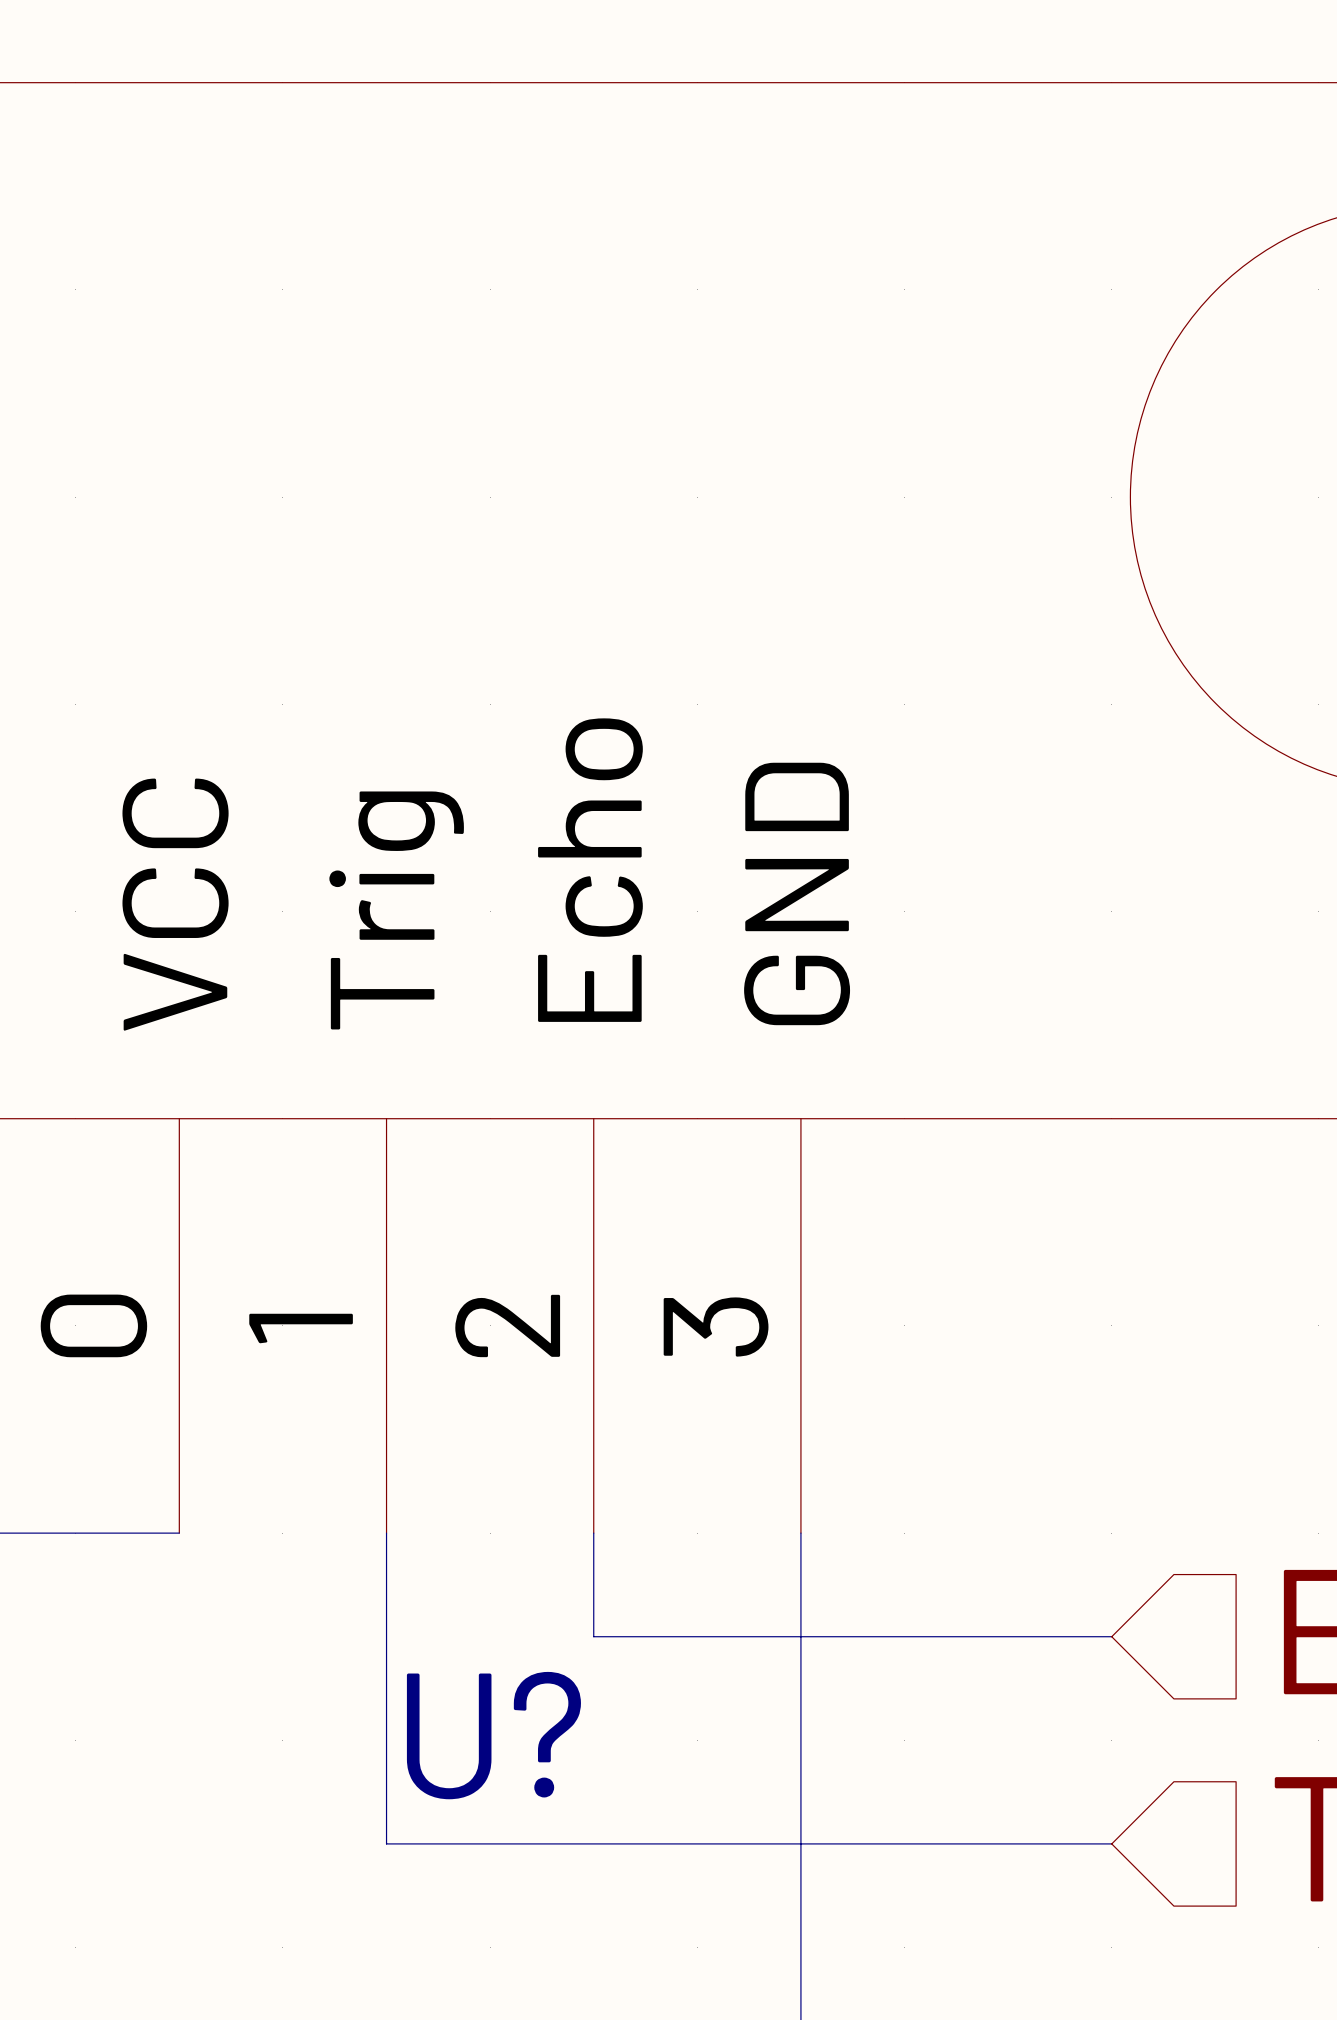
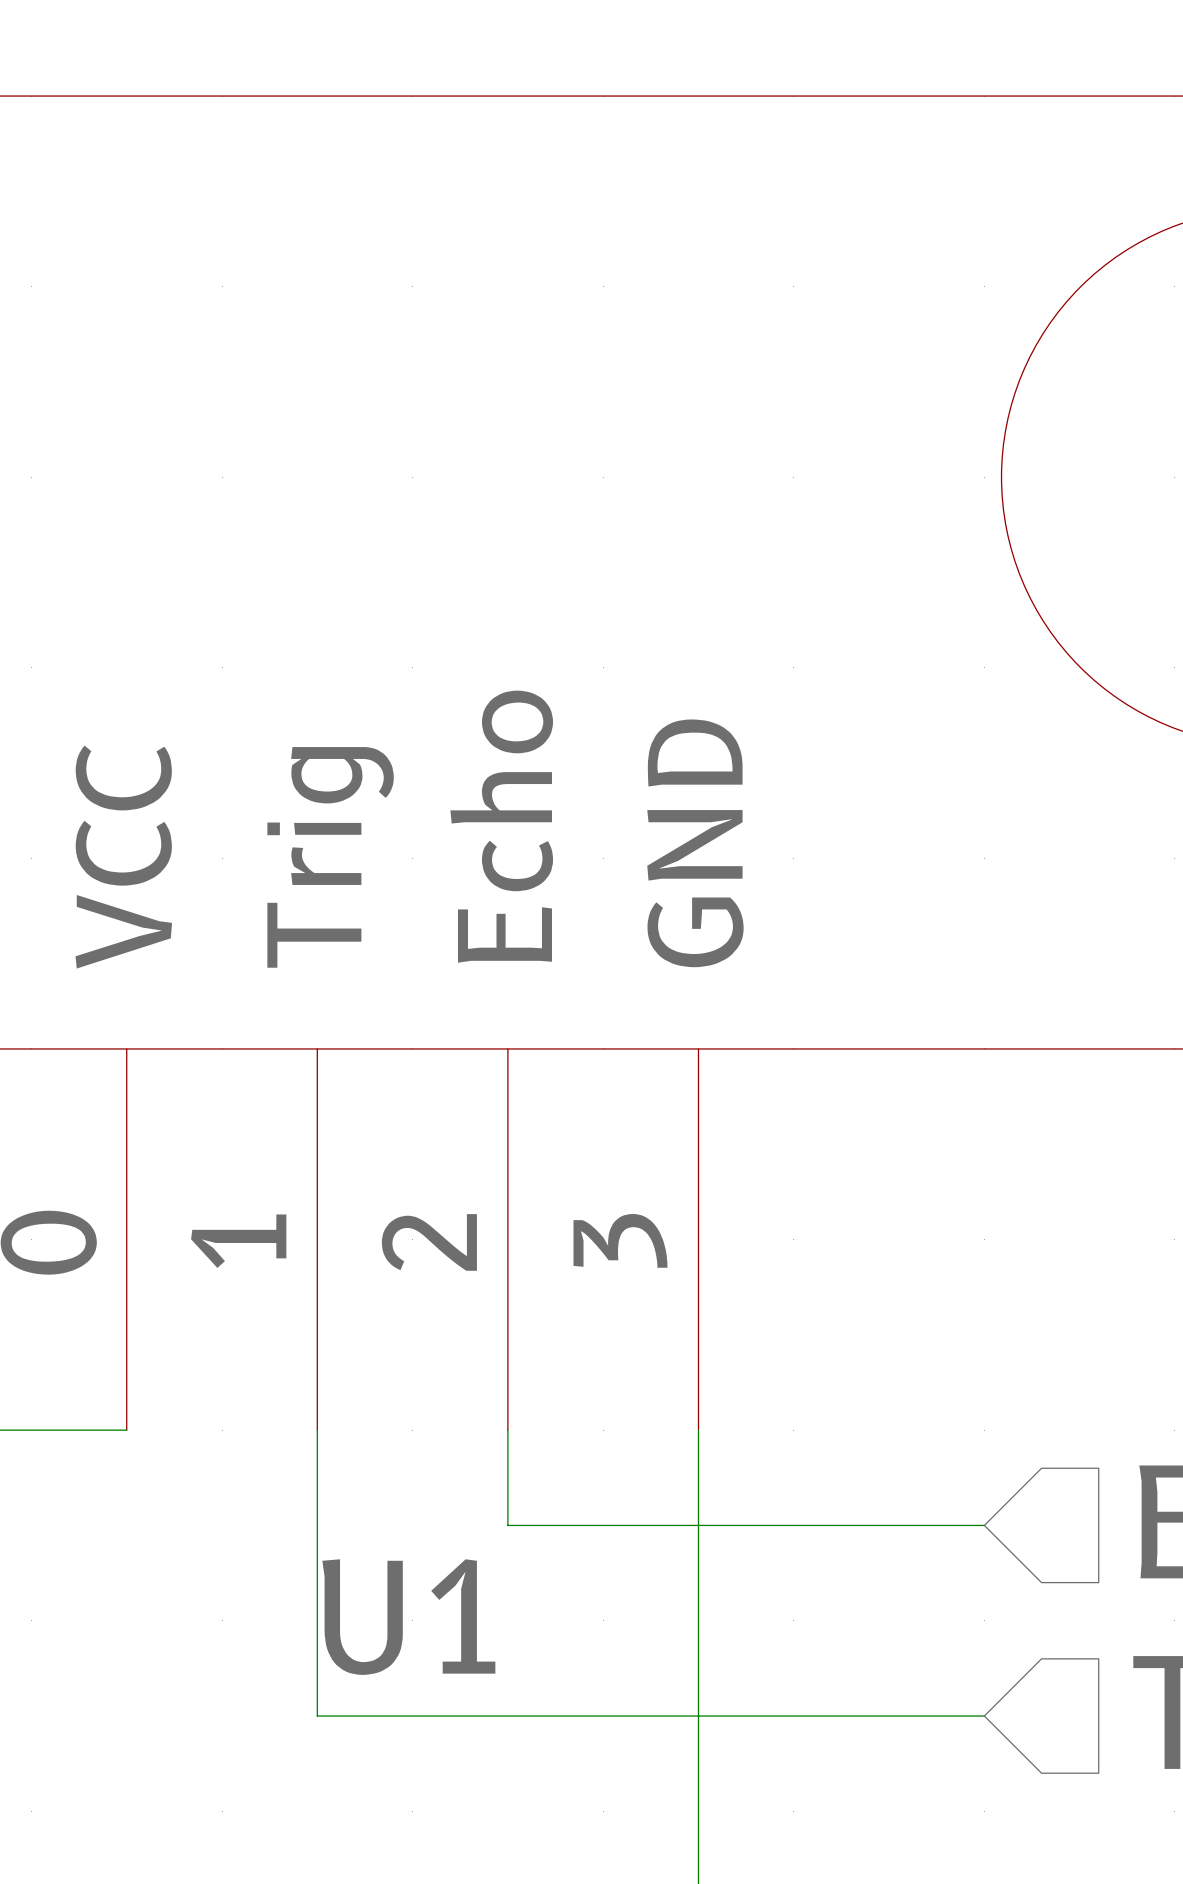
U? name: U? (493, 1735) -> U1 (408, 1617)

